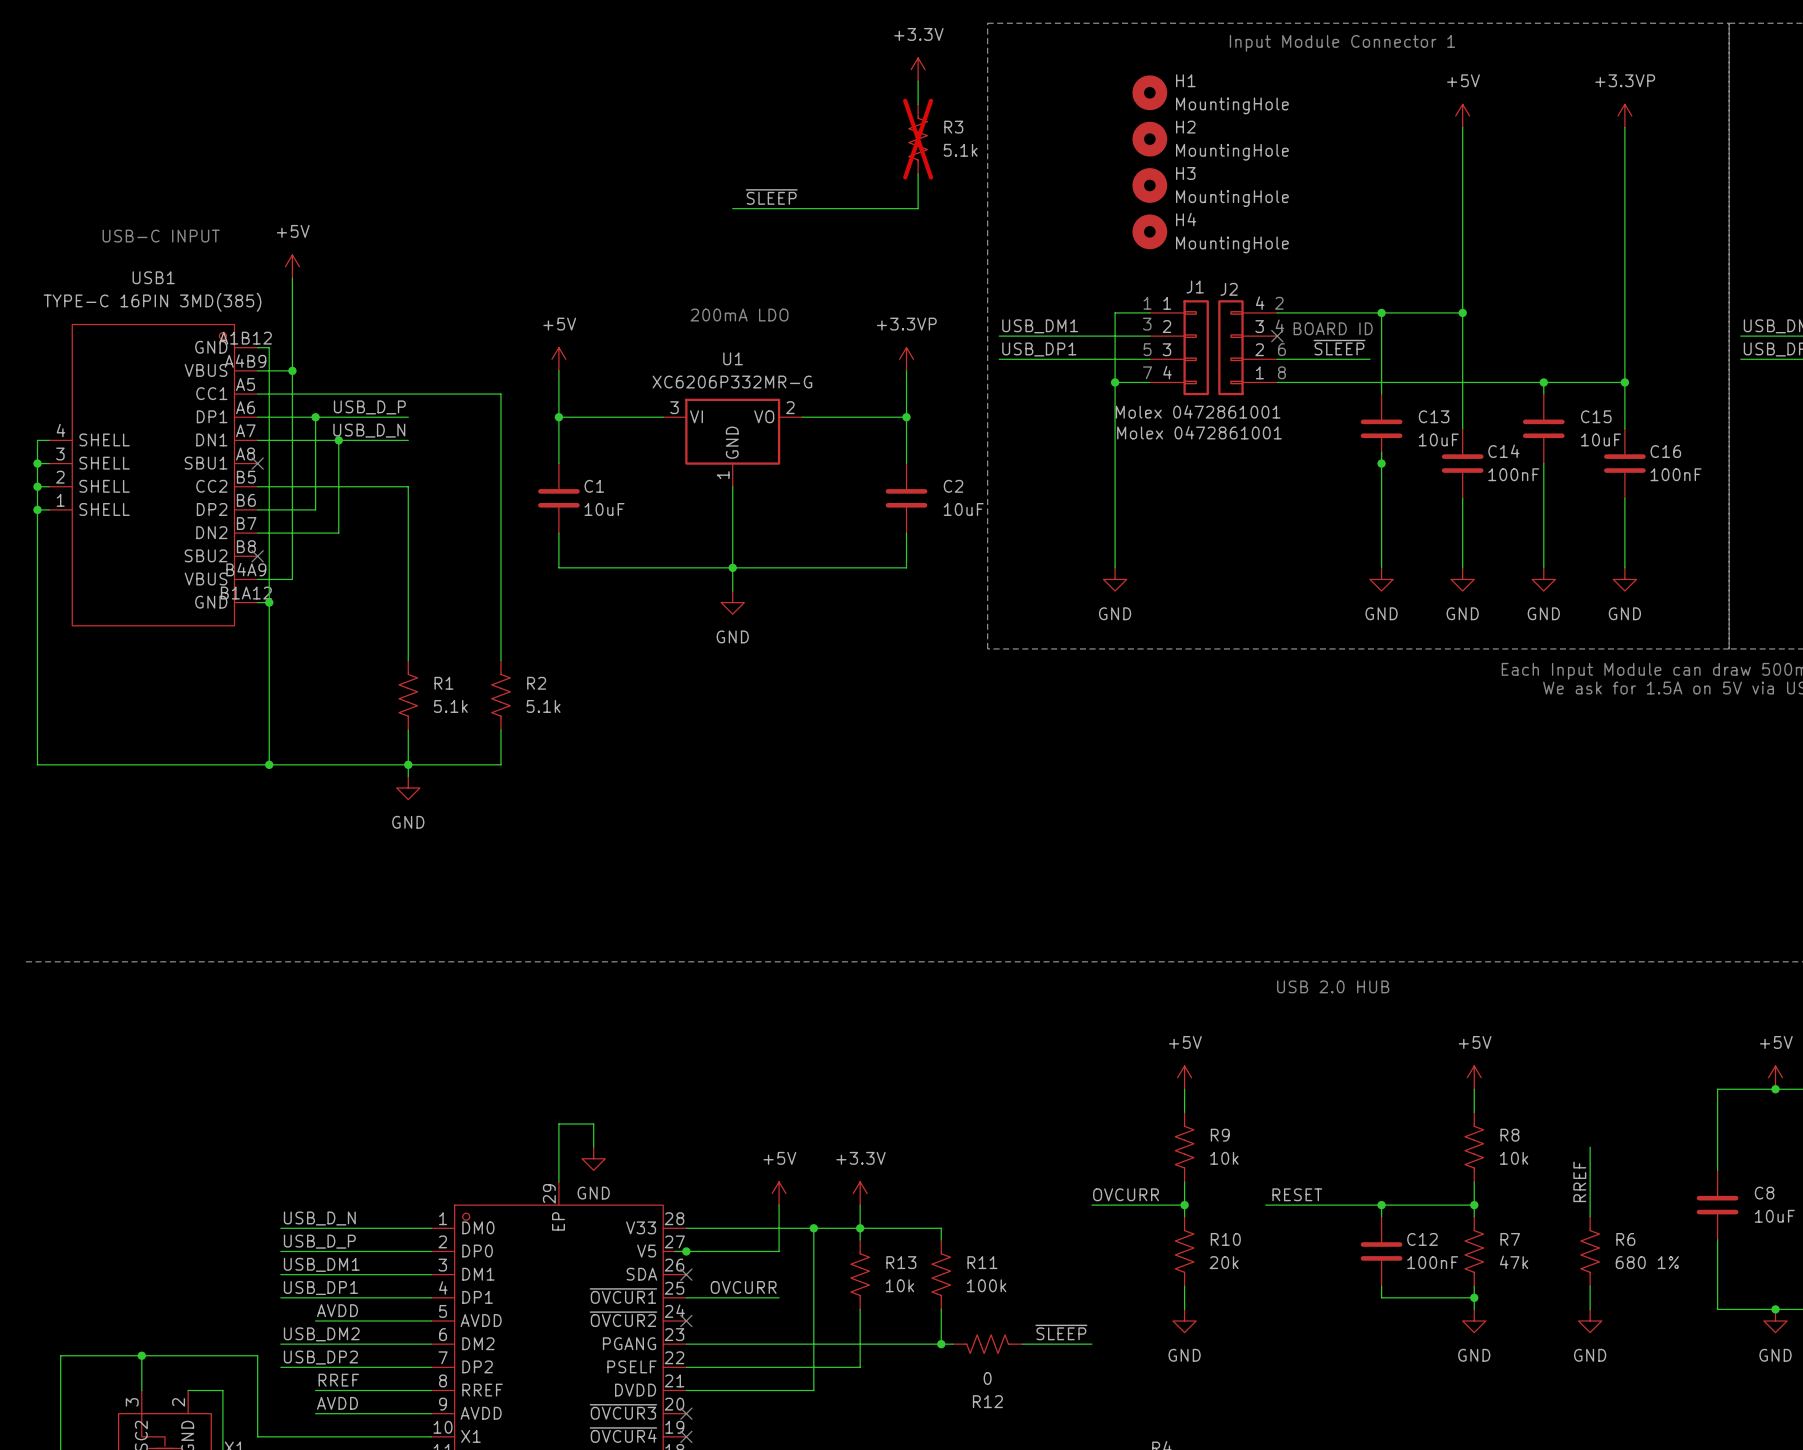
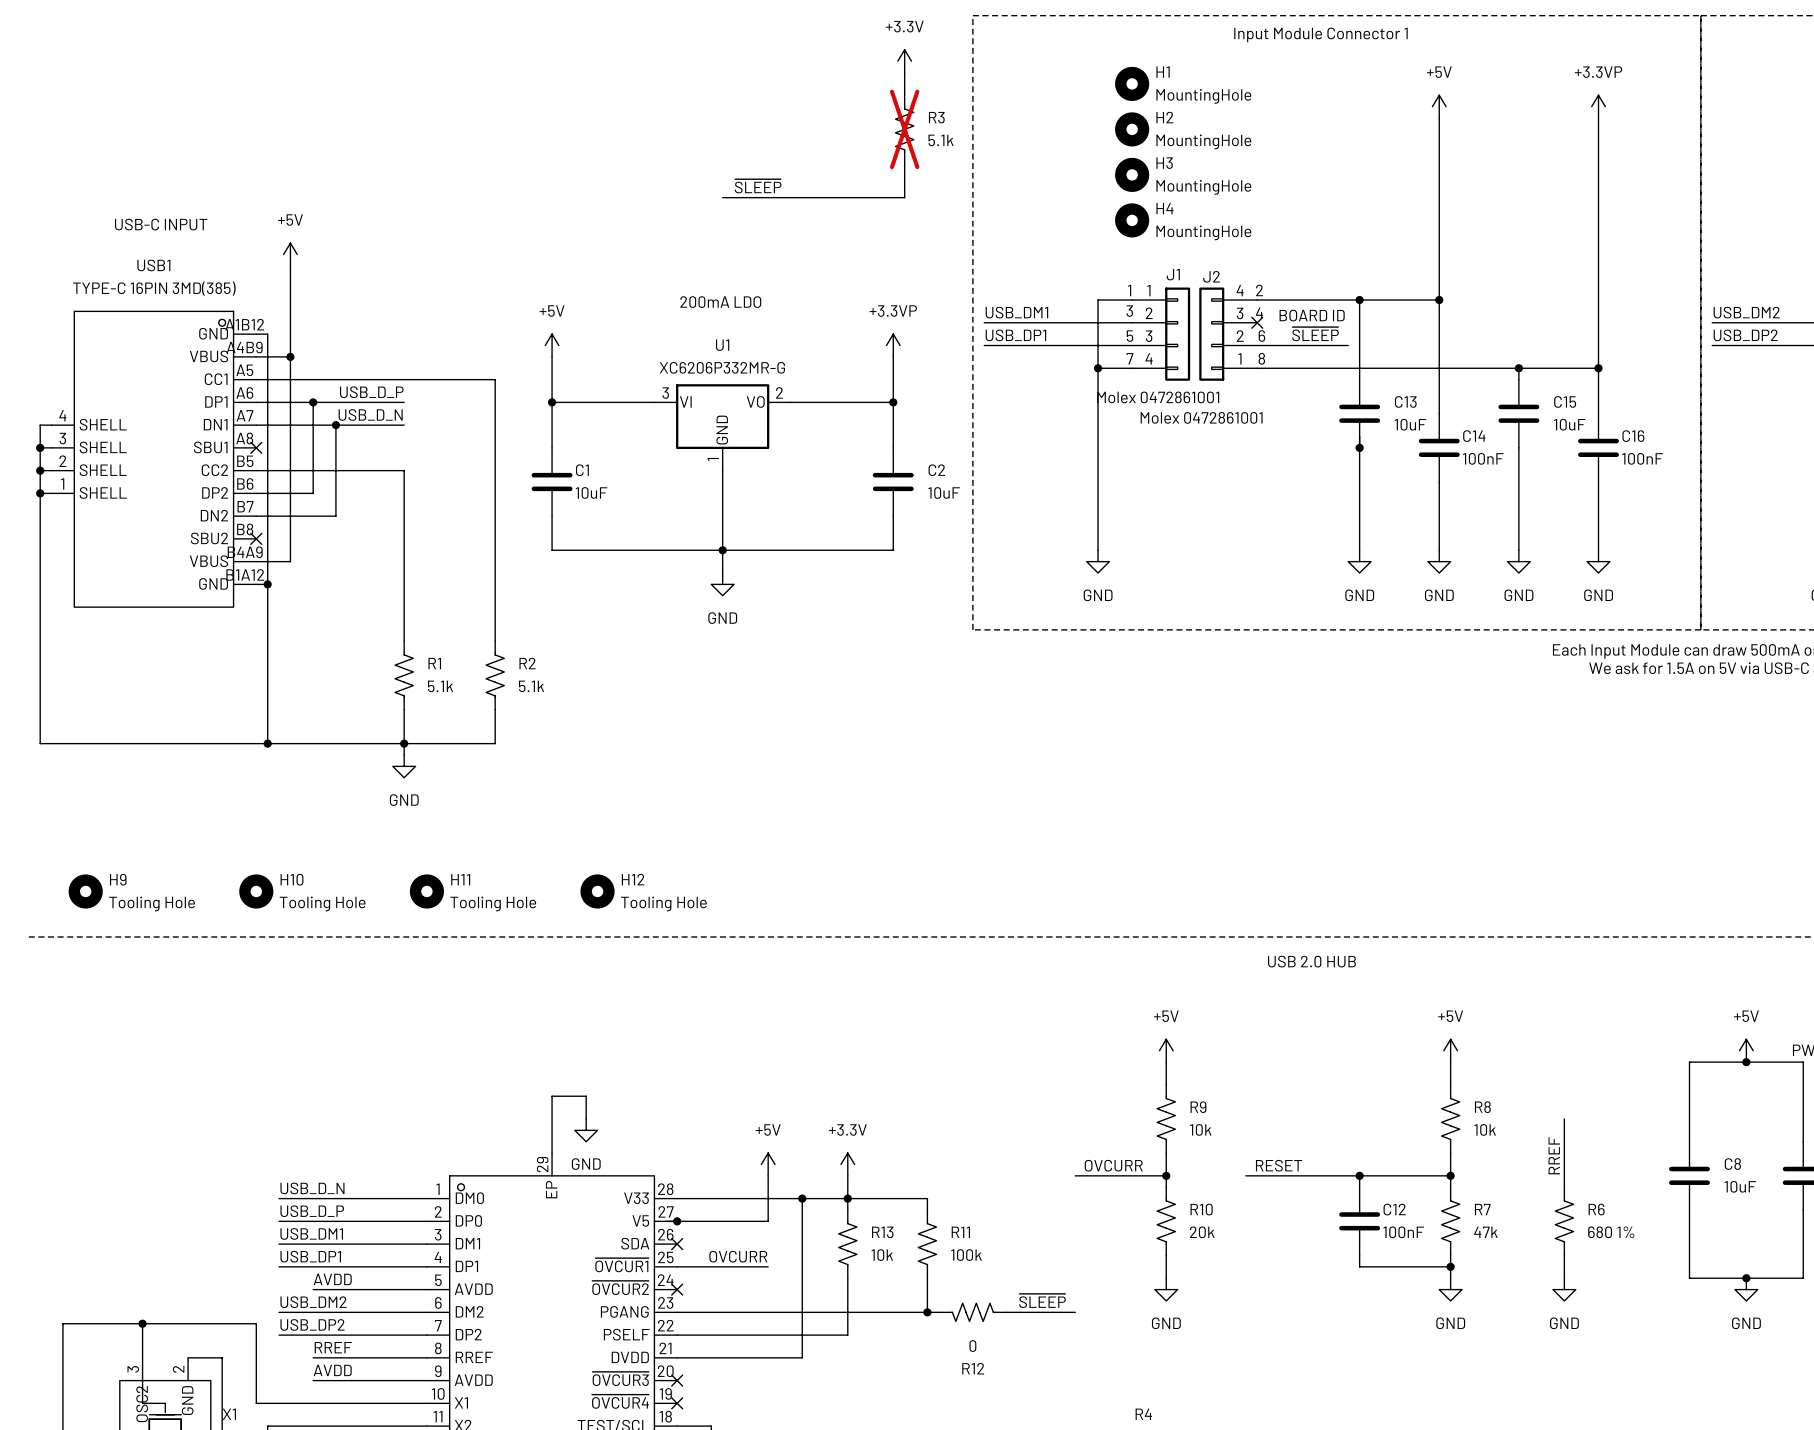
H9: none -> Tooling Hole (85, 891)
H10: none -> Tooling Hole (256, 891)
H11: none -> Tooling Hole (426, 891)
H12: none -> Tooling Hole (597, 891)

